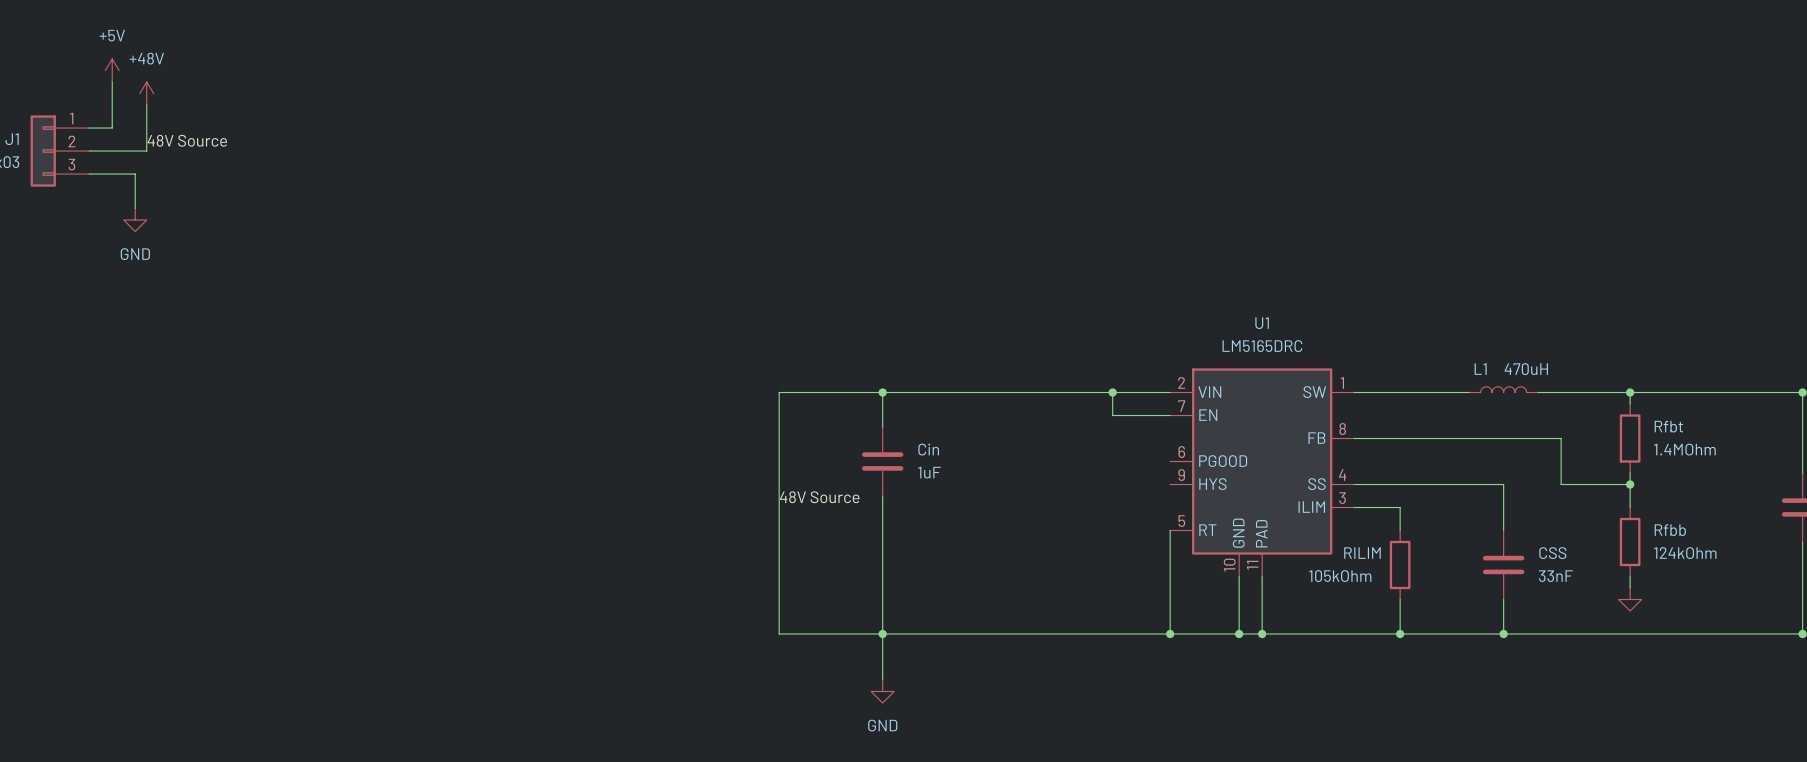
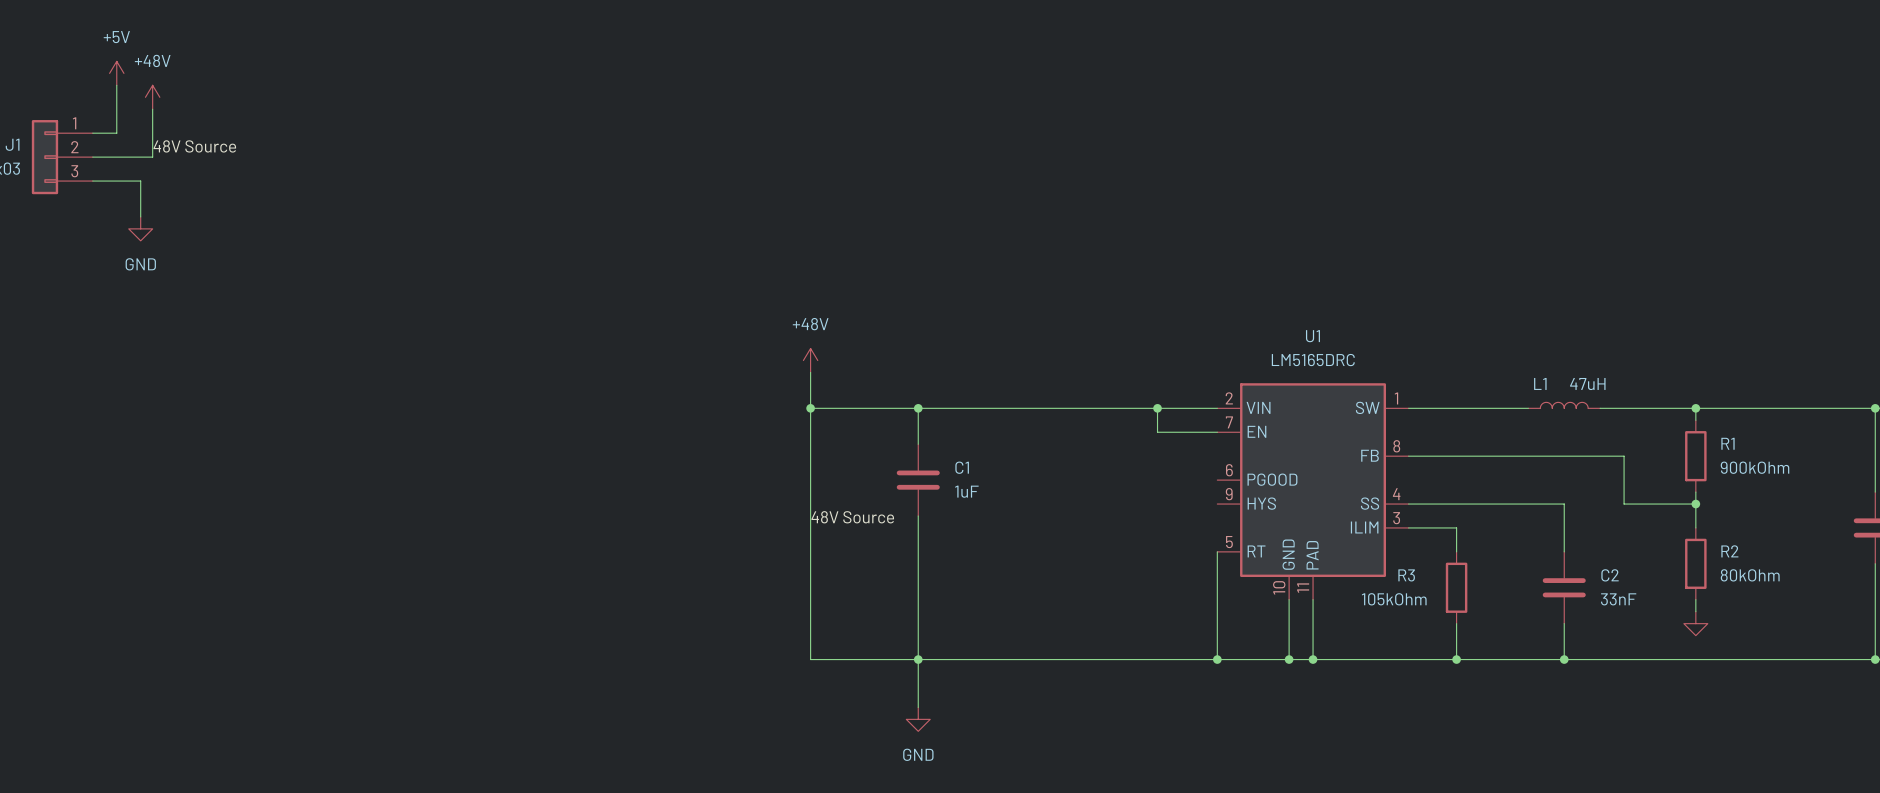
power symbol: none -> +48V (810, 360)
wire: none -> (810, 372) (810, 408)
L1 value: 470uH (1526, 369) -> 47uH (1587, 384)
junction: none -> (810, 408)
Rfbt name: Rfbt (1668, 426) -> R1 (1727, 443)
Cin name: Cin (928, 449) -> C1 (962, 467)
Rfbt value: 1.4MOhm (1684, 449) -> 900kOhm (1755, 467)
Rfbb name: Rfbb (1670, 530) -> R2 (1729, 551)
RILIM name: RILIM (1362, 553) -> R3 (1406, 575)
CSS name: CSS (1552, 553) -> C2 (1610, 575)
Rfbb value: 124kOhm (1685, 553) -> 80kOhm (1750, 575)

